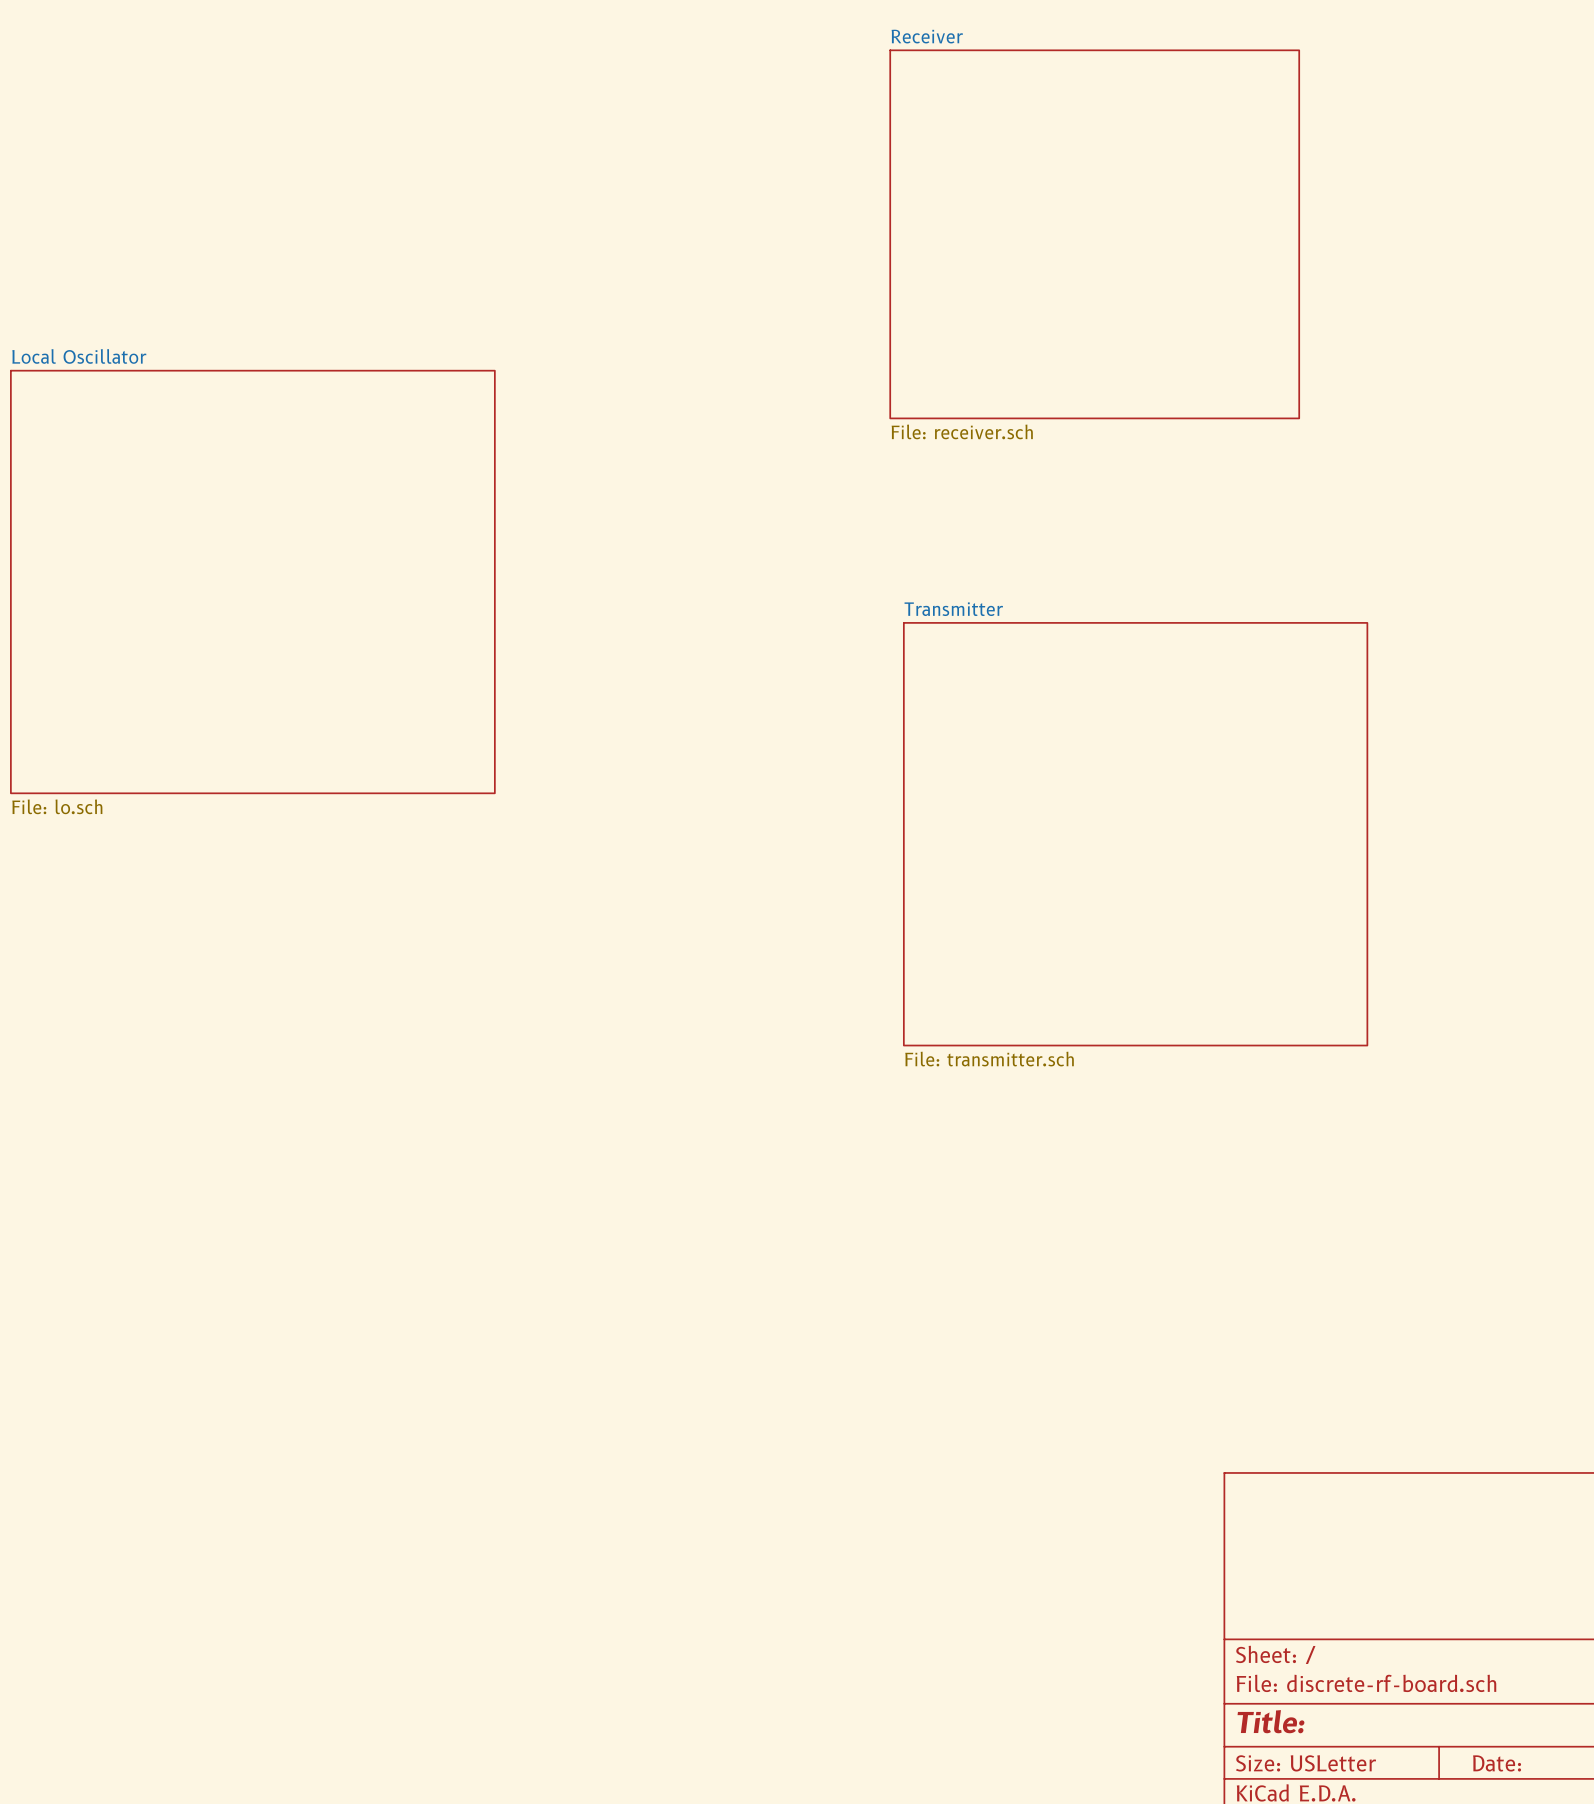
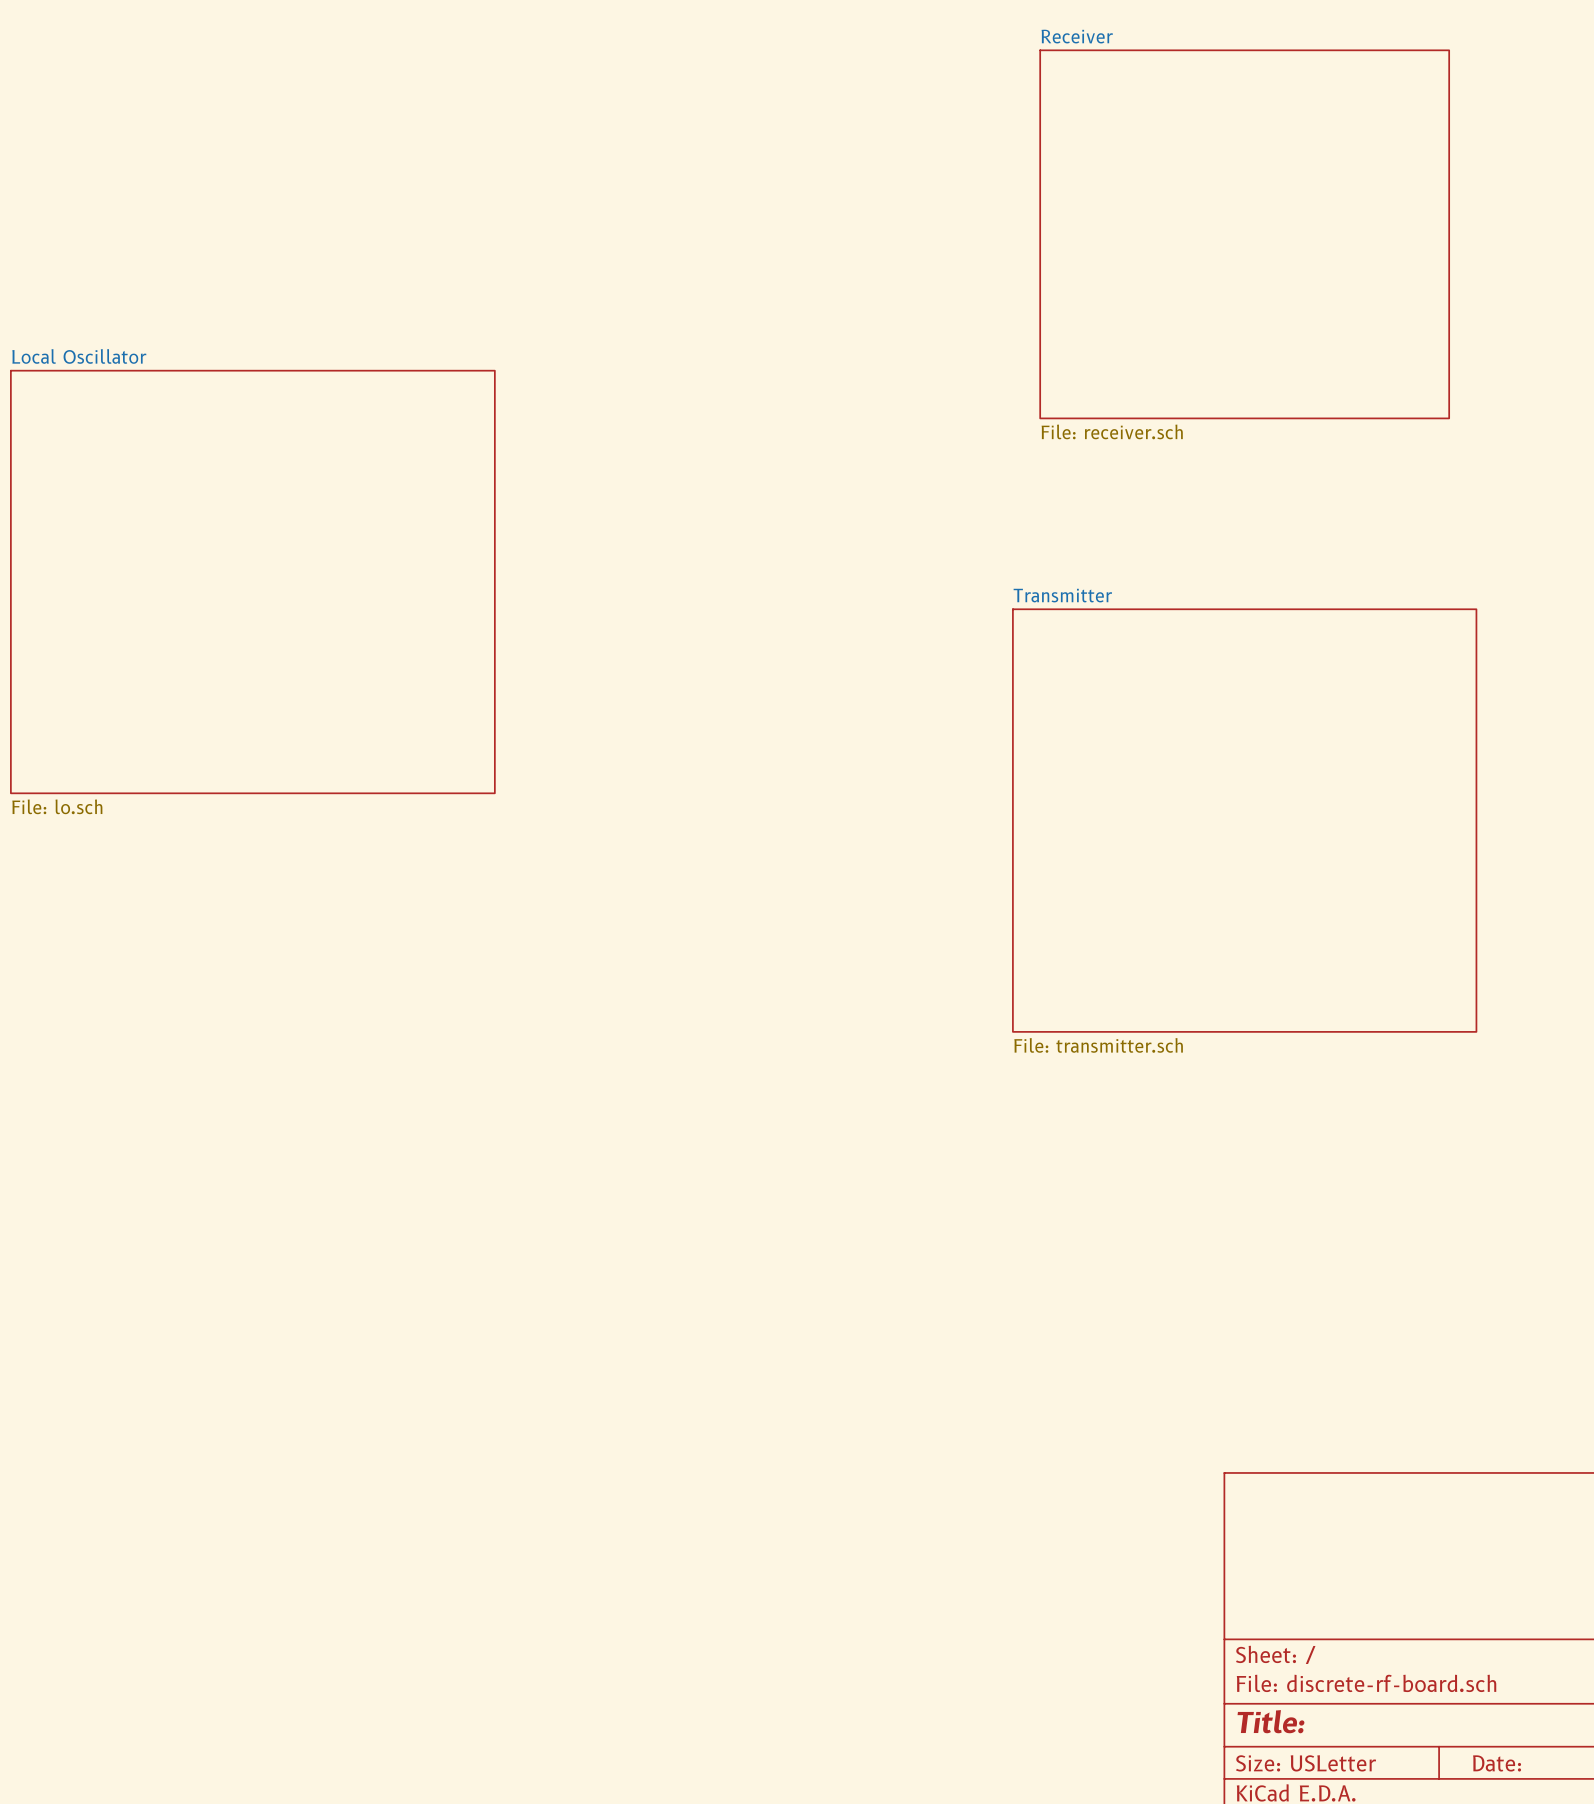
sheet Receiver position: (1094, 234) -> (1244, 234)
sheet Transmitter position: (1135, 834) -> (1244, 820)

